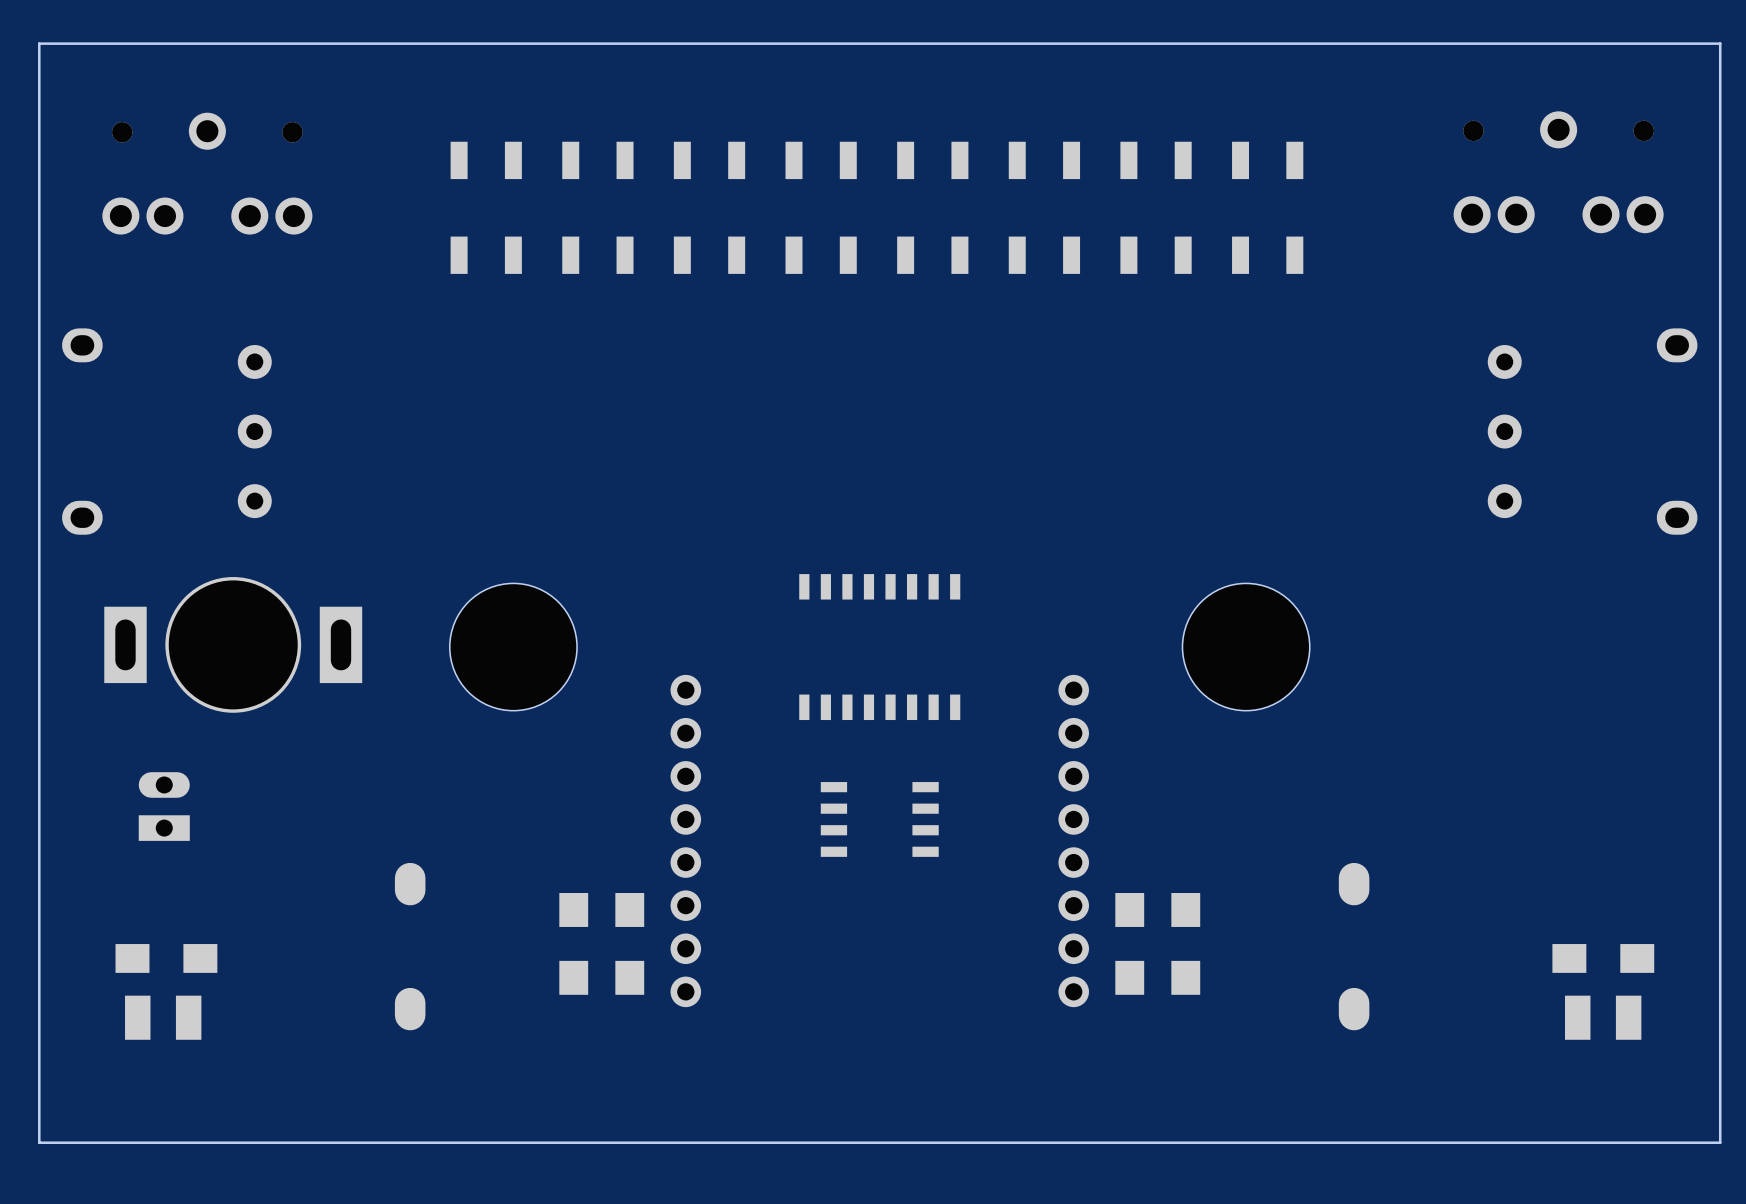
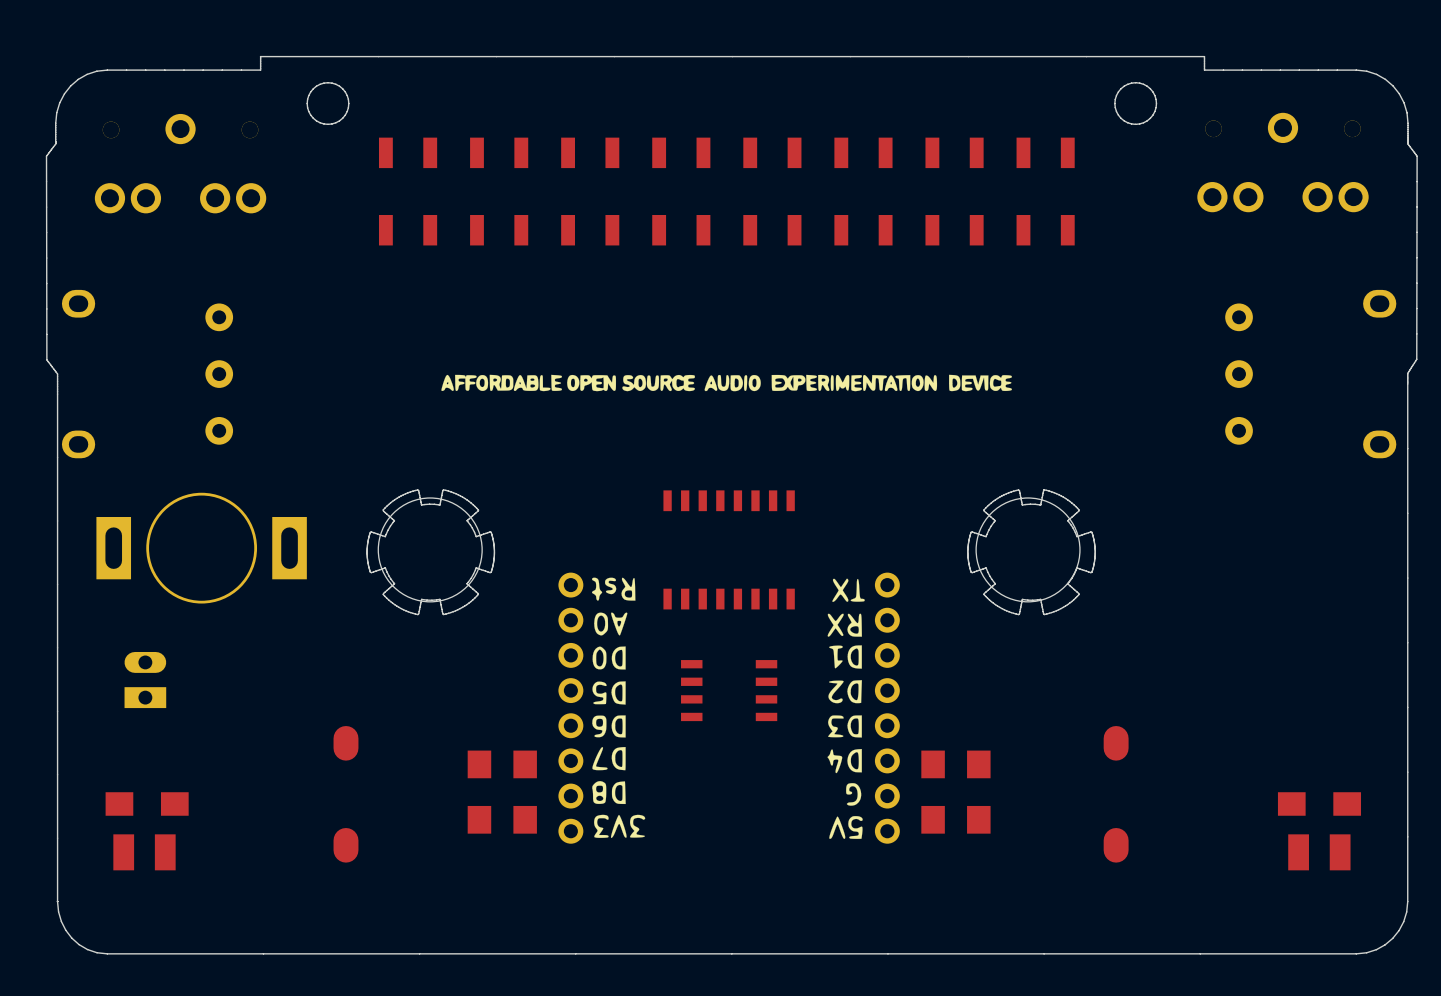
drawing: none -> [45, 55, 1418, 955]
board edge: (39, 43) (39, 1142) (1720, 1142) (1720, 43) (39, 43) -> none

